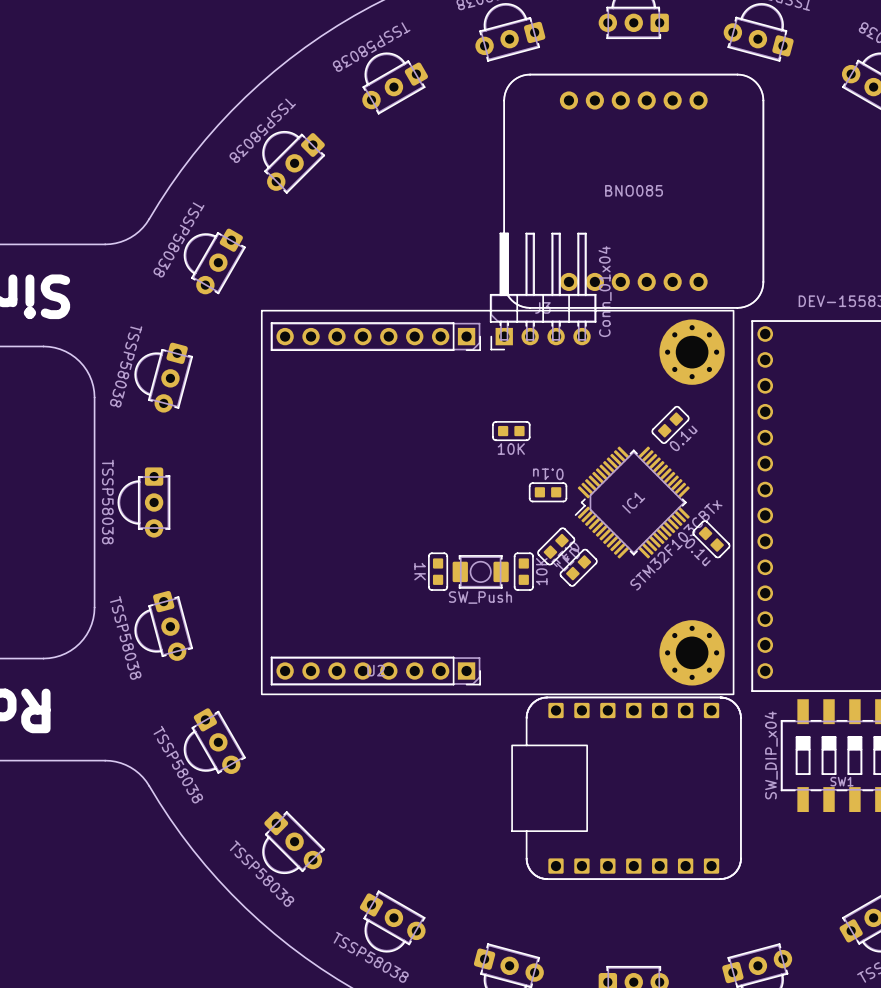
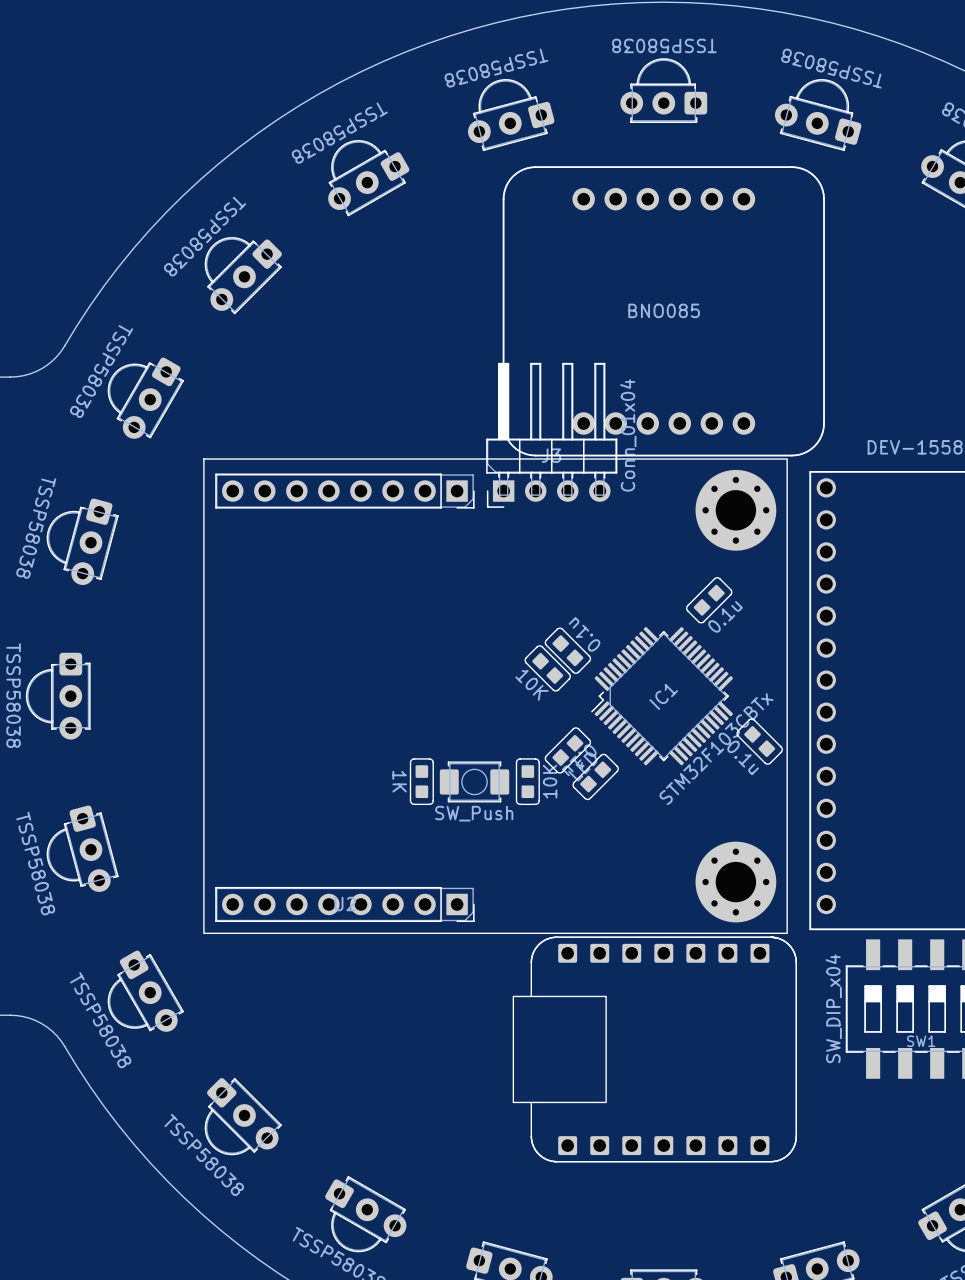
part: 10K (511, 431) -> none
part: none -> 0.1u (567, 650)
part: none -> 10K (547, 668)
part: 0.1u (548, 492) -> none

